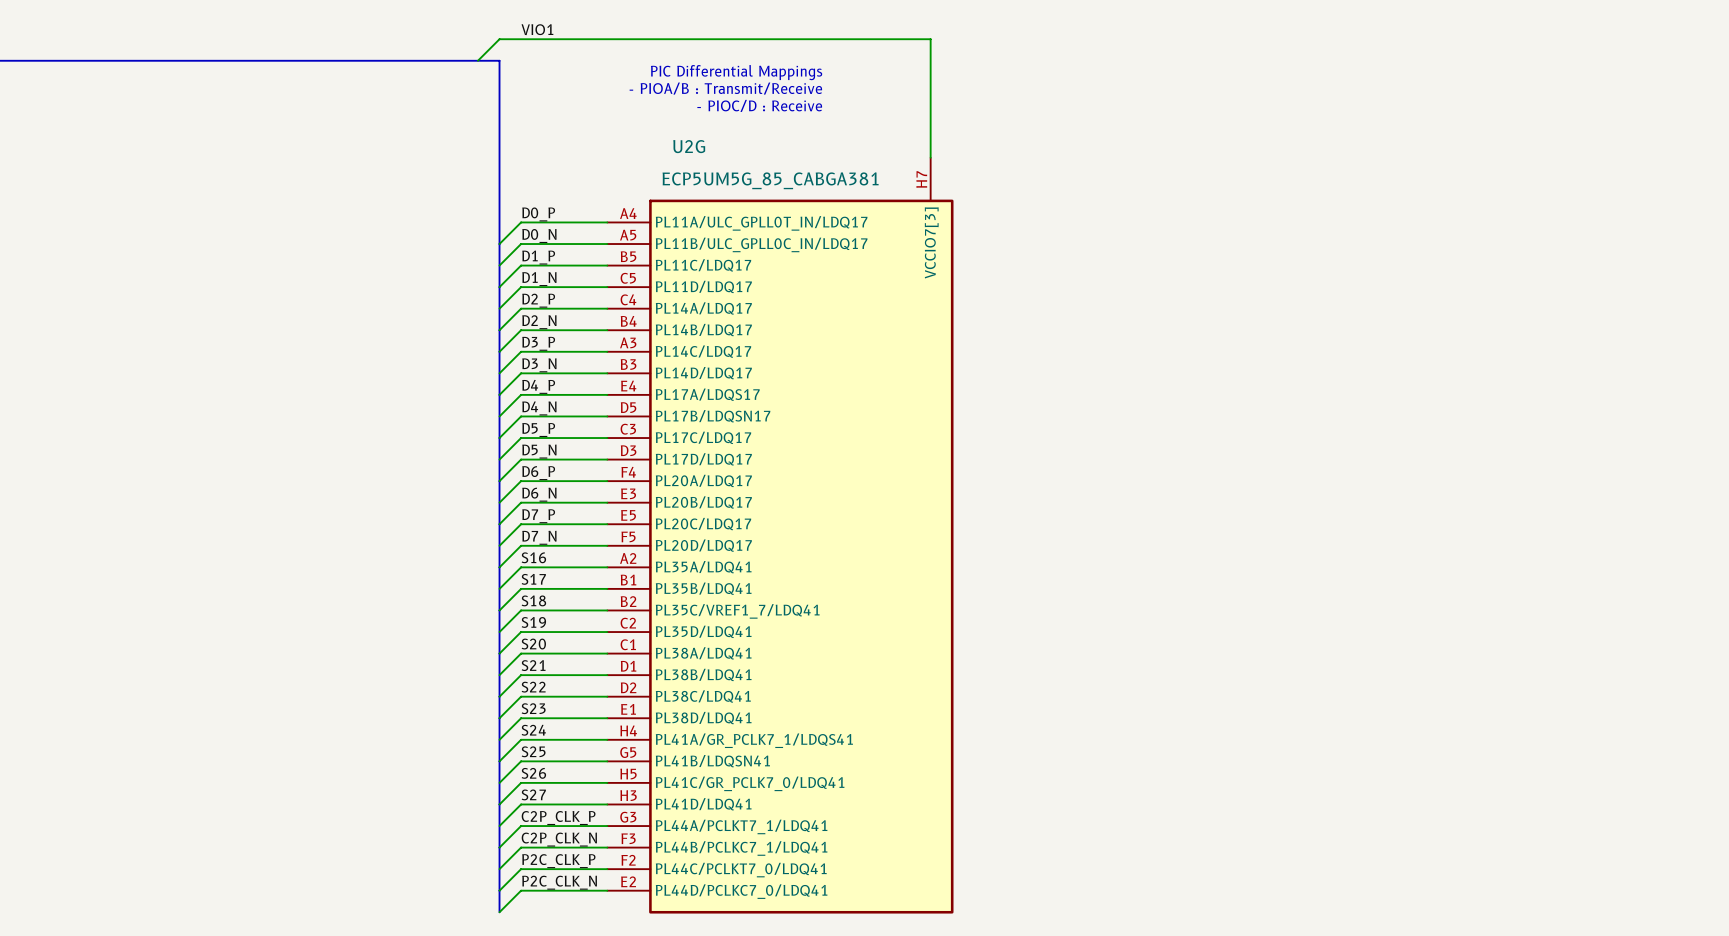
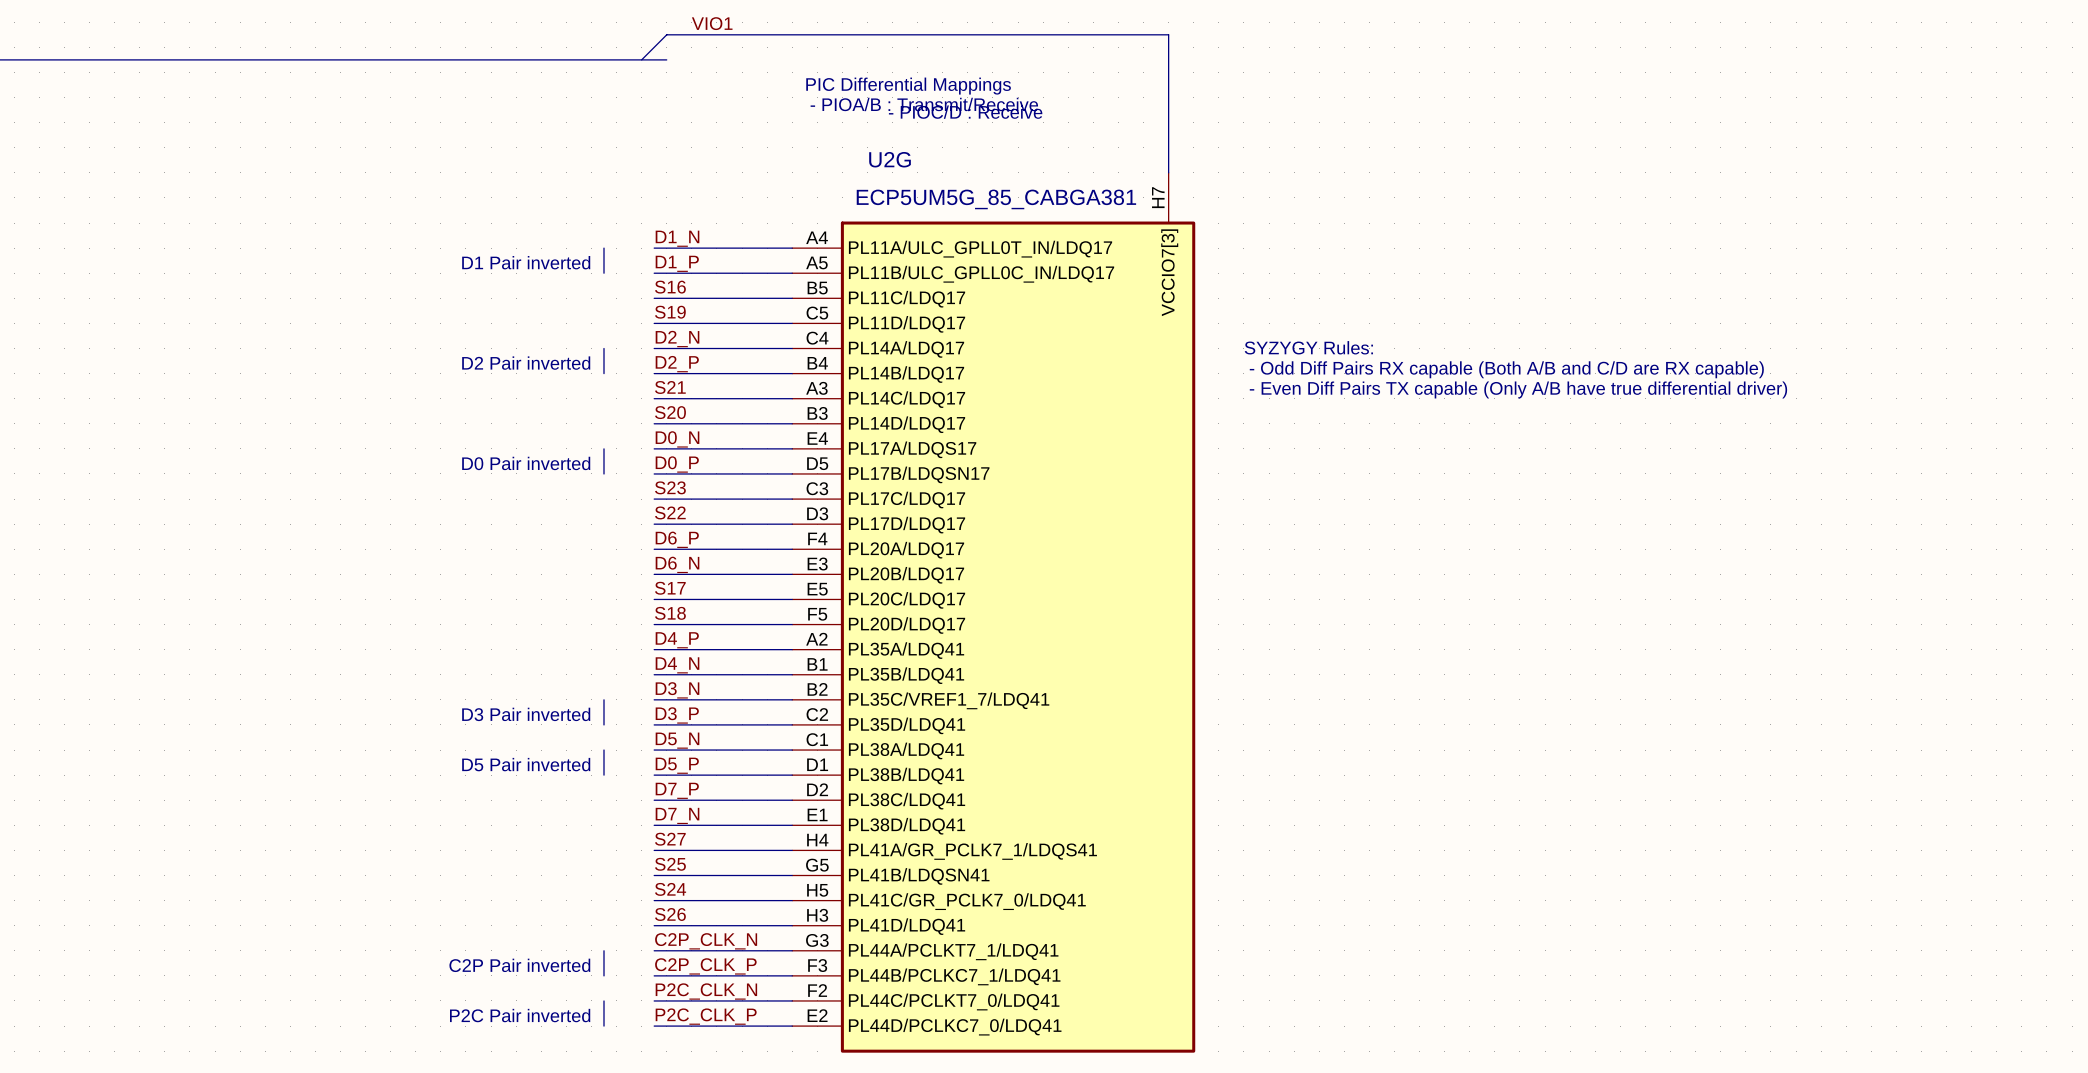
bus: (499, 60) (499, 912) -> none
text position: PIC Differential Mappings (736, 72) -> PIC Differential Mappings (908, 86)
text position: - PIOA/B : Transmit/Receive (725, 88) -> - PIOA/B : Transmit/Receive (924, 104)
label position: D0_P (538, 214) -> D0_P (677, 464)
line: none -> (603, 248) (603, 273)
wire: (521, 222) (499, 244) -> (691, 248) (654, 248)
text: none -> D1 Pair inverted (526, 262)
label position: D0_N (539, 236) -> D0_N (677, 439)
wire: (521, 244) (499, 265) -> (691, 273) (654, 273)
label: none -> S16 (670, 287)
label position: D1_P (538, 257) -> D1_P (677, 263)
wire: (521, 265) (499, 287) -> (691, 298) (654, 298)
label: none -> S19 (670, 312)
label position: D1_N (539, 279) -> D1_N (677, 238)
wire: (521, 287) (499, 308) -> (691, 323) (654, 323)
label position: D2_P (538, 300) -> D2_P (677, 364)
text: none -> SYZYGY Rules: (1308, 347)
line: none -> (603, 348) (603, 373)
wire: (521, 308) (499, 330) -> (691, 348) (654, 348)
text: none -> D2 Pair inverted (526, 363)
label position: D2_N (539, 322) -> D2_N (677, 339)
text: none -> - Odd Diff Pairs RX capable (Both A/B and C/D are RX capable) (1506, 369)
wire: (521, 330) (499, 351) -> (691, 373) (654, 373)
label: none -> S21 (670, 387)
label: D3_P (538, 343) -> none
text: none -> - Even Diff Pairs TX capable (Only A/B have true differential driver) (1518, 389)
wire: (521, 351) (499, 373) -> (691, 398) (654, 398)
label: none -> S20 (670, 412)
label: D3_N (539, 365) -> none
wire: (521, 373) (499, 394) -> (691, 423) (654, 423)
label position: D4_P (538, 386) -> D4_P (677, 640)
line: none -> (603, 448) (603, 473)
wire: (521, 394) (499, 416) -> (691, 448) (654, 448)
text: none -> D0 Pair inverted (526, 463)
label position: D4_N (539, 408) -> D4_N (677, 665)
wire: (521, 416) (499, 438) -> (691, 473) (654, 473)
label: none -> S23 (670, 487)
label: D5_P (538, 430) -> none
wire: (521, 438) (499, 459) -> (691, 499) (654, 499)
label: none -> S22 (670, 512)
label position: D5_N (539, 451) -> D5_N (677, 740)
wire: (521, 459) (499, 481) -> (691, 524) (654, 524)
label position: D6_P (538, 473) -> D6_P (677, 539)
wire: (521, 481) (499, 502) -> (691, 549) (654, 549)
label position: D6_N (539, 494) -> D6_N (677, 564)
wire: (521, 502) (499, 524) -> (691, 574) (654, 574)
label position: D7_P (538, 516) -> D7_P (677, 790)
wire: (521, 524) (499, 545) -> (691, 599) (654, 599)
label position: D7_N (539, 537) -> D7_N (677, 815)
wire: (521, 545) (499, 567) -> (691, 624) (654, 624)
label: S16 (533, 557) -> none
wire: (521, 567) (499, 588) -> (691, 649) (654, 649)
label position: S17 (533, 579) -> S17 (670, 588)
wire: (521, 588) (499, 610) -> (691, 674) (654, 674)
label position: S18 (533, 600) -> S18 (670, 613)
label: none -> D3_N (677, 690)
line: none -> (603, 699) (603, 724)
wire: (521, 610) (499, 632) -> (691, 699) (654, 699)
text: none -> D3 Pair inverted (526, 714)
label: S19 (533, 622) -> none
label: none -> D3_P (677, 715)
wire: (521, 632) (499, 653) -> (691, 724) (654, 724)
label: S20 (533, 644) -> none
line: none -> (603, 750) (603, 775)
wire: (521, 653) (499, 675) -> (691, 750) (654, 750)
label: S21 (533, 665) -> none
text: none -> D5 Pair inverted (526, 764)
label: none -> D5_P (677, 765)
wire: (521, 675) (499, 696) -> (691, 775) (654, 775)
label: S22 (533, 687) -> none
wire: (521, 696) (499, 718) -> (691, 800) (654, 800)
label: S23 (533, 708) -> none
wire: (521, 718) (499, 739) -> (691, 825) (654, 825)
label position: S24 (533, 730) -> S24 (670, 889)
wire: (521, 739) (499, 761) -> (691, 850) (654, 850)
label position: S25 (533, 751) -> S25 (670, 864)
wire: (521, 761) (499, 782) -> (691, 875) (654, 875)
label position: S26 (533, 773) -> S26 (670, 914)
wire: (521, 782) (499, 804) -> (691, 900) (654, 900)
label position: S27 (533, 794) -> S27 (670, 839)
wire: (521, 804) (499, 826) -> (691, 925) (654, 925)
label position: C2P_CLK_P (558, 818) -> C2P_CLK_P (705, 966)
line: none -> (603, 950) (603, 975)
wire: (521, 826) (499, 847) -> (691, 950) (654, 950)
text: none -> C2P Pair inverted (519, 965)
label position: C2P_CLK_N (559, 839) -> C2P_CLK_N (706, 941)
wire: (521, 847) (499, 869) -> (691, 975) (654, 975)
label position: P2C_CLK_P (558, 861) -> P2C_CLK_P (706, 1016)
line: none -> (603, 1000) (603, 1026)
wire: (521, 869) (499, 890) -> (691, 1000) (654, 1000)
text: none -> P2C Pair inverted (520, 1015)
label position: P2C_CLK_N (559, 882) -> P2C_CLK_N (706, 991)
wire: (521, 890) (499, 912) -> (691, 1026) (654, 1026)

